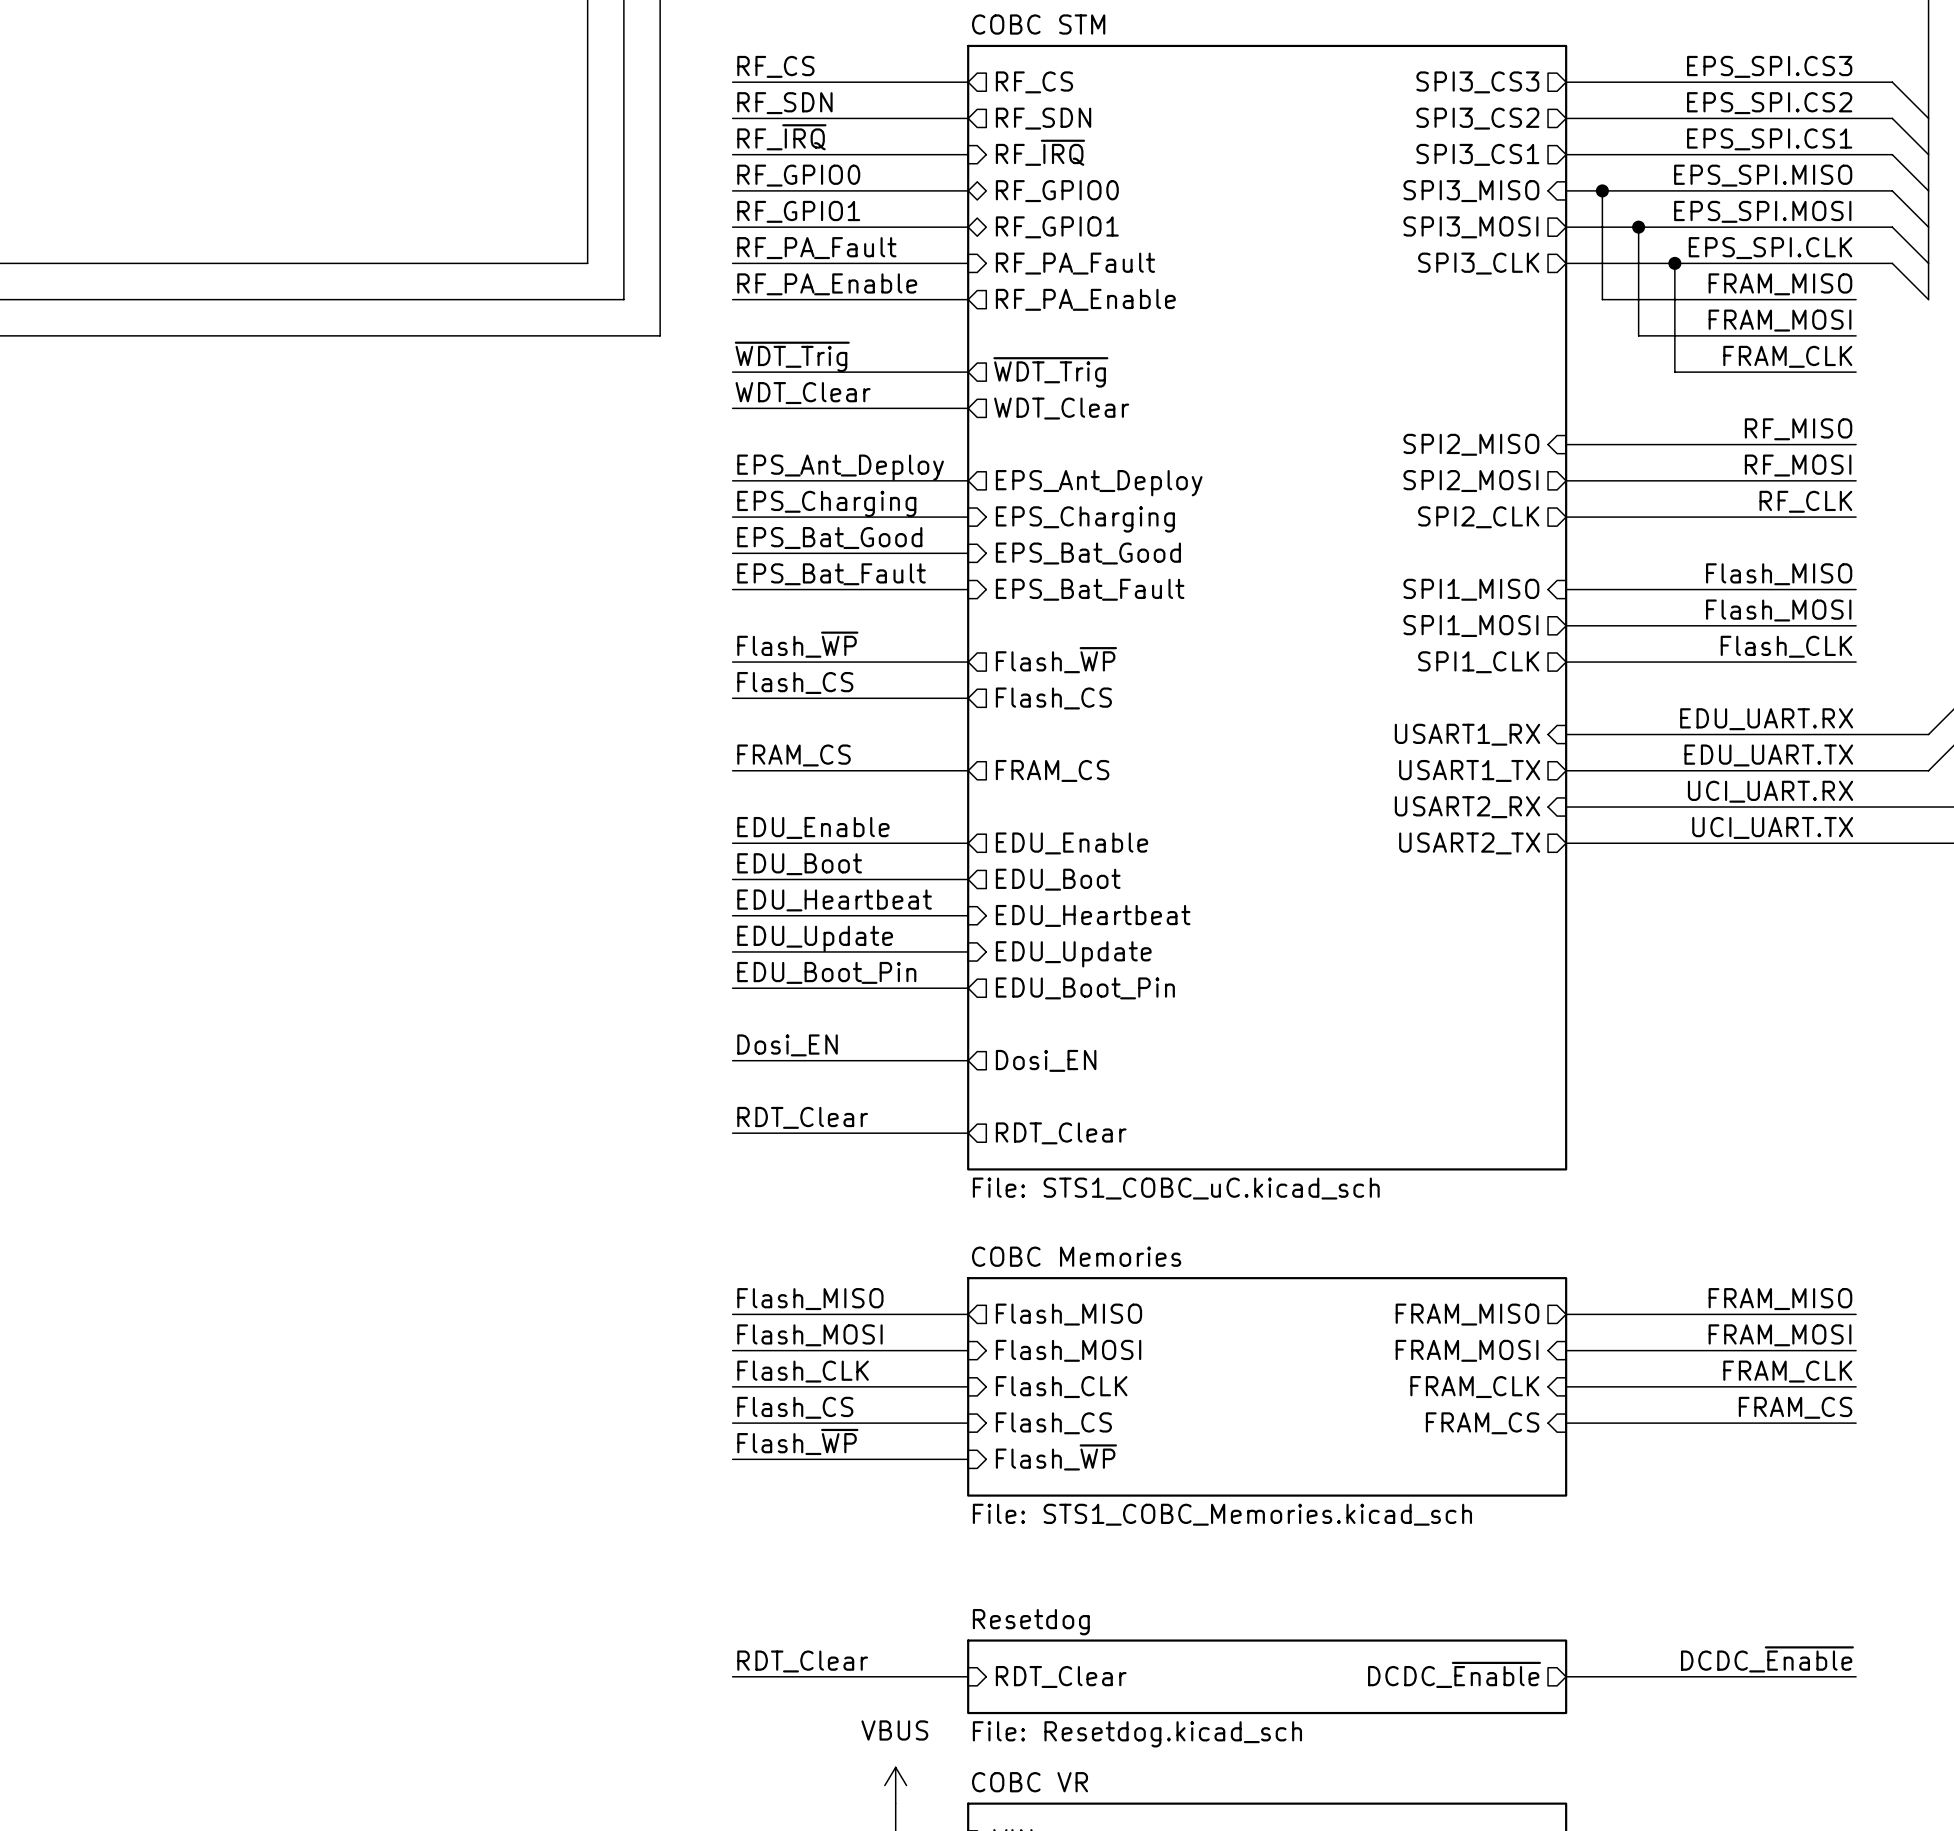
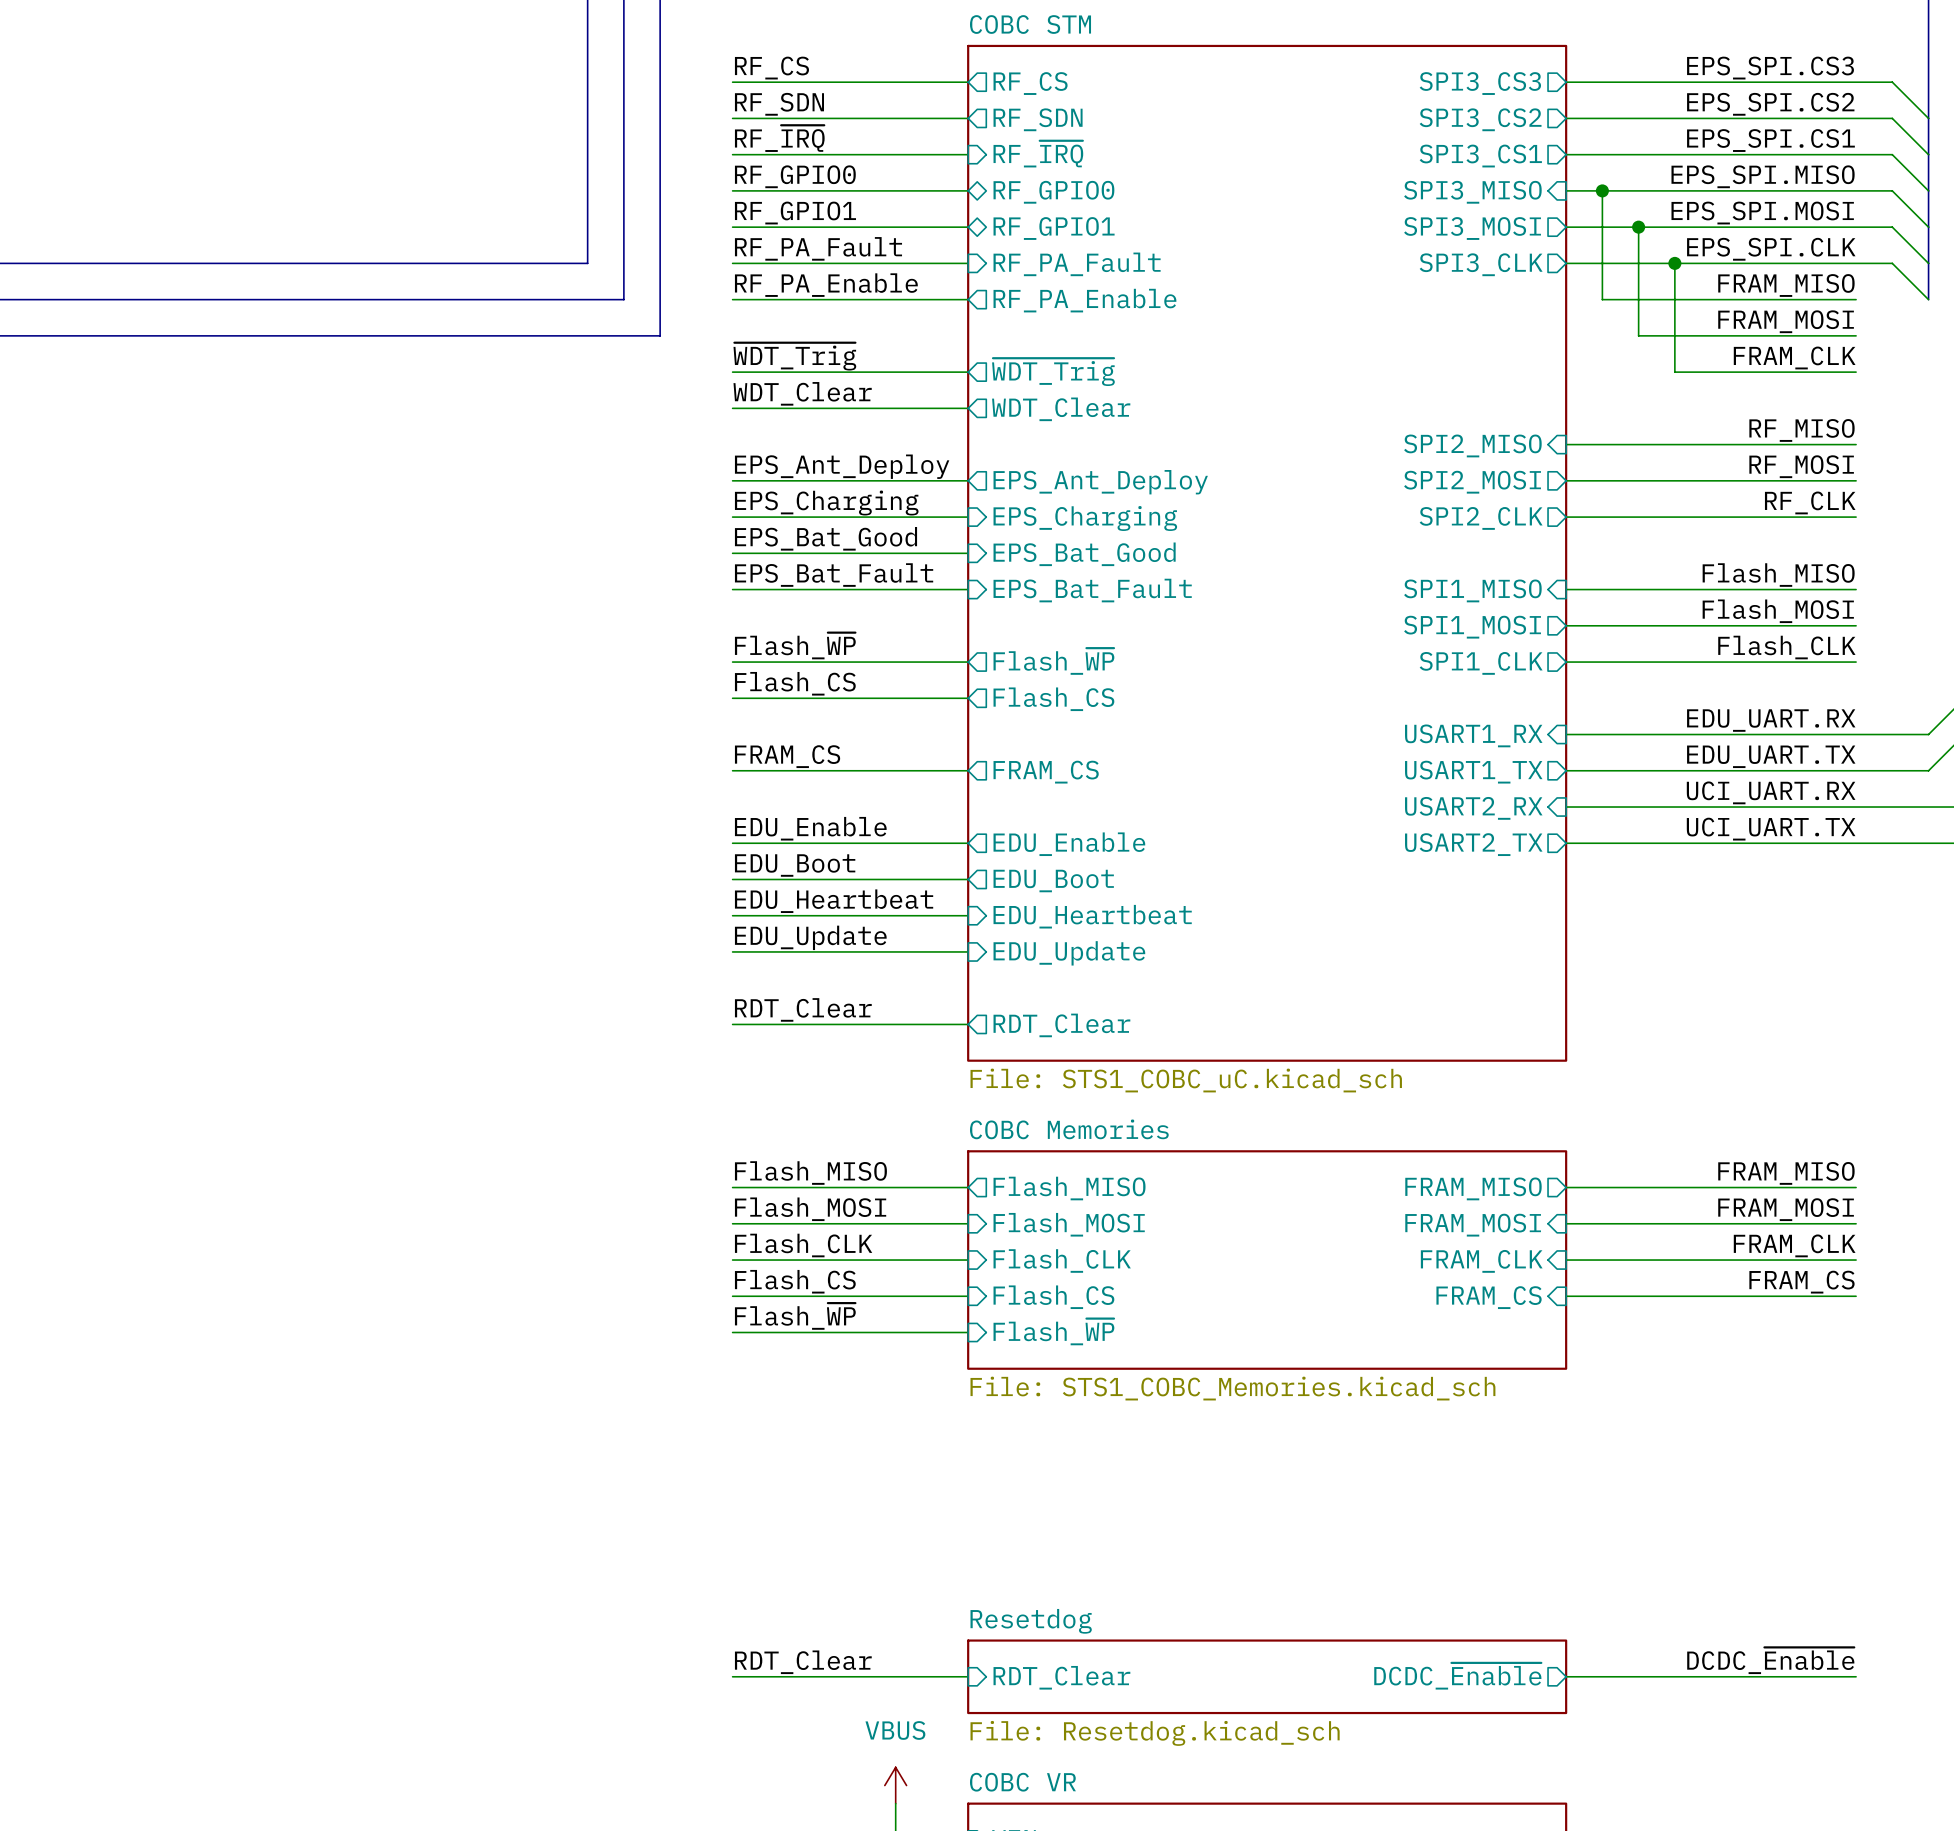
sheet COBC STM: none -> File: STS1_COBC_uC.kicad_sch (1267, 553)
sheet COBC STM: File: STS1_COBC_uC.kicad_sch (1267, 607) -> none
label: EDU_Boot_Pin (826, 972) -> none
wire: (732, 988) (968, 988) -> none
sheet pin: EDU_Boot_Pin (1085, 988) -> none
label: Dosi_EN (787, 1045) -> none
wire: (732, 1060) (968, 1060) -> (732, 1024) (968, 1024)
sheet pin: Dosi_EN (1046, 1060) -> none
label position: RDT_Clear (802, 1117) -> RDT_Clear (803, 1009)
wire: (732, 1133) (968, 1133) -> none
sheet pin position: RDT_Clear (1061, 1133) -> RDT_Clear (1061, 1025)
label position: Flash_MISO (810, 1299) -> Flash_MISO (810, 1173)
label position: FRAM_MISO (1780, 1299) -> FRAM_MISO (1786, 1173)
wire: (732, 1314) (968, 1314) -> (732, 1187) (968, 1187)
sheet pin position: Flash_MISO (1068, 1314) -> Flash_MISO (1069, 1188)
sheet pin position: FRAM_MISO (1467, 1314) -> FRAM_MISO (1473, 1188)
wire: (1566, 1314) (1856, 1314) -> (1566, 1187) (1856, 1187)
label position: Flash_MOSI (809, 1335) -> Flash_MOSI (810, 1209)
label position: FRAM_MOSI (1780, 1335) -> FRAM_MOSI (1786, 1209)
wire: (732, 1350) (968, 1350) -> (732, 1223) (968, 1223)
sheet pin position: Flash_MOSI (1068, 1350) -> Flash_MOSI (1069, 1224)
sheet pin position: FRAM_MOSI (1467, 1350) -> FRAM_MOSI (1473, 1225)
wire: (1566, 1350) (1856, 1350) -> (1566, 1223) (1856, 1223)
label position: Flash_CLK (803, 1371) -> Flash_CLK (803, 1245)
label position: FRAM_CLK (1787, 1371) -> FRAM_CLK (1794, 1245)
wire: (732, 1386) (968, 1386) -> (732, 1260) (968, 1260)
sheet COBC Memories position: (1267, 1386) -> (1267, 1260)
wire: (1566, 1386) (1856, 1386) -> (1566, 1260) (1856, 1260)
sheet pin position: Flash_CLK (1061, 1387) -> Flash_CLK (1062, 1260)
sheet pin position: FRAM_CLK (1474, 1387) -> FRAM_CLK (1481, 1261)
label position: Flash_CS (795, 1407) -> Flash_CS (795, 1281)
label position: FRAM_CS (1795, 1407) -> FRAM_CS (1801, 1282)
wire: (732, 1423) (968, 1423) -> (732, 1296) (968, 1296)
sheet pin position: Flash_CS (1053, 1423) -> Flash_CS (1053, 1297)
sheet pin position: FRAM_CS (1482, 1423) -> FRAM_CS (1489, 1297)
wire: (1566, 1423) (1856, 1423) -> (1566, 1296) (1856, 1296)
label position: Flash_~{WP} (797, 1441) -> Flash_~{WP} (795, 1316)
sheet pin position: Flash_~{WP} (1056, 1457) -> Flash_~{WP} (1053, 1331)
wire: (732, 1459) (968, 1459) -> (732, 1332) (968, 1332)

